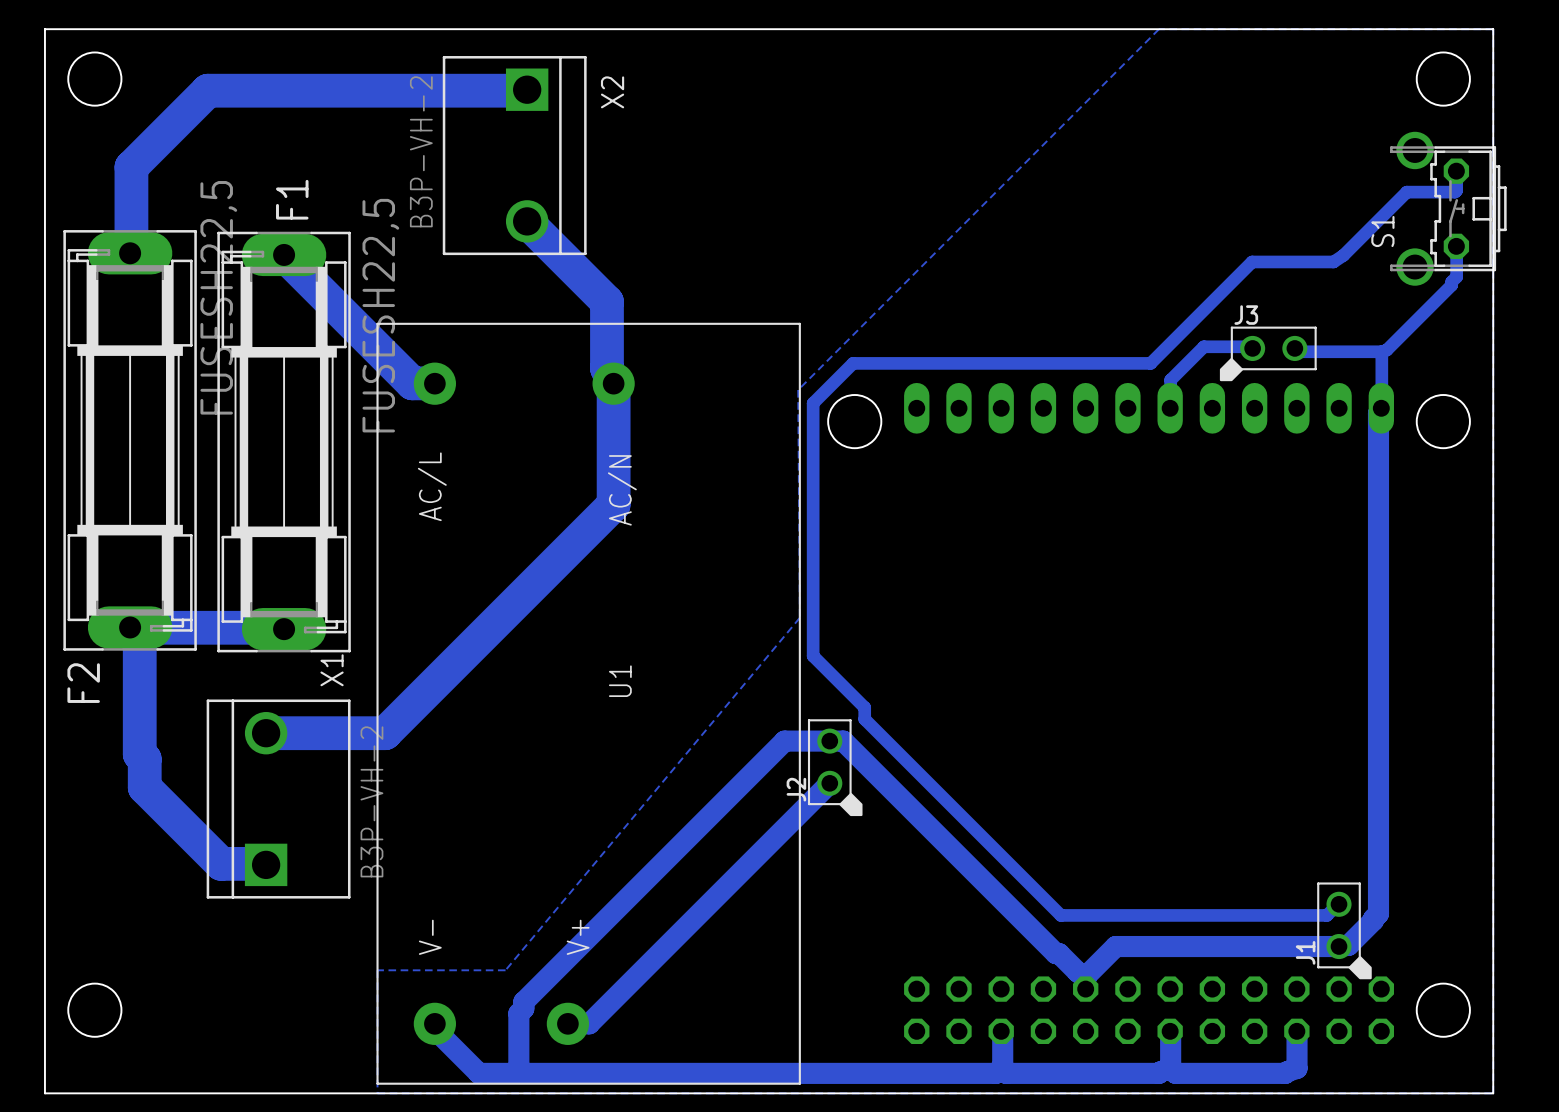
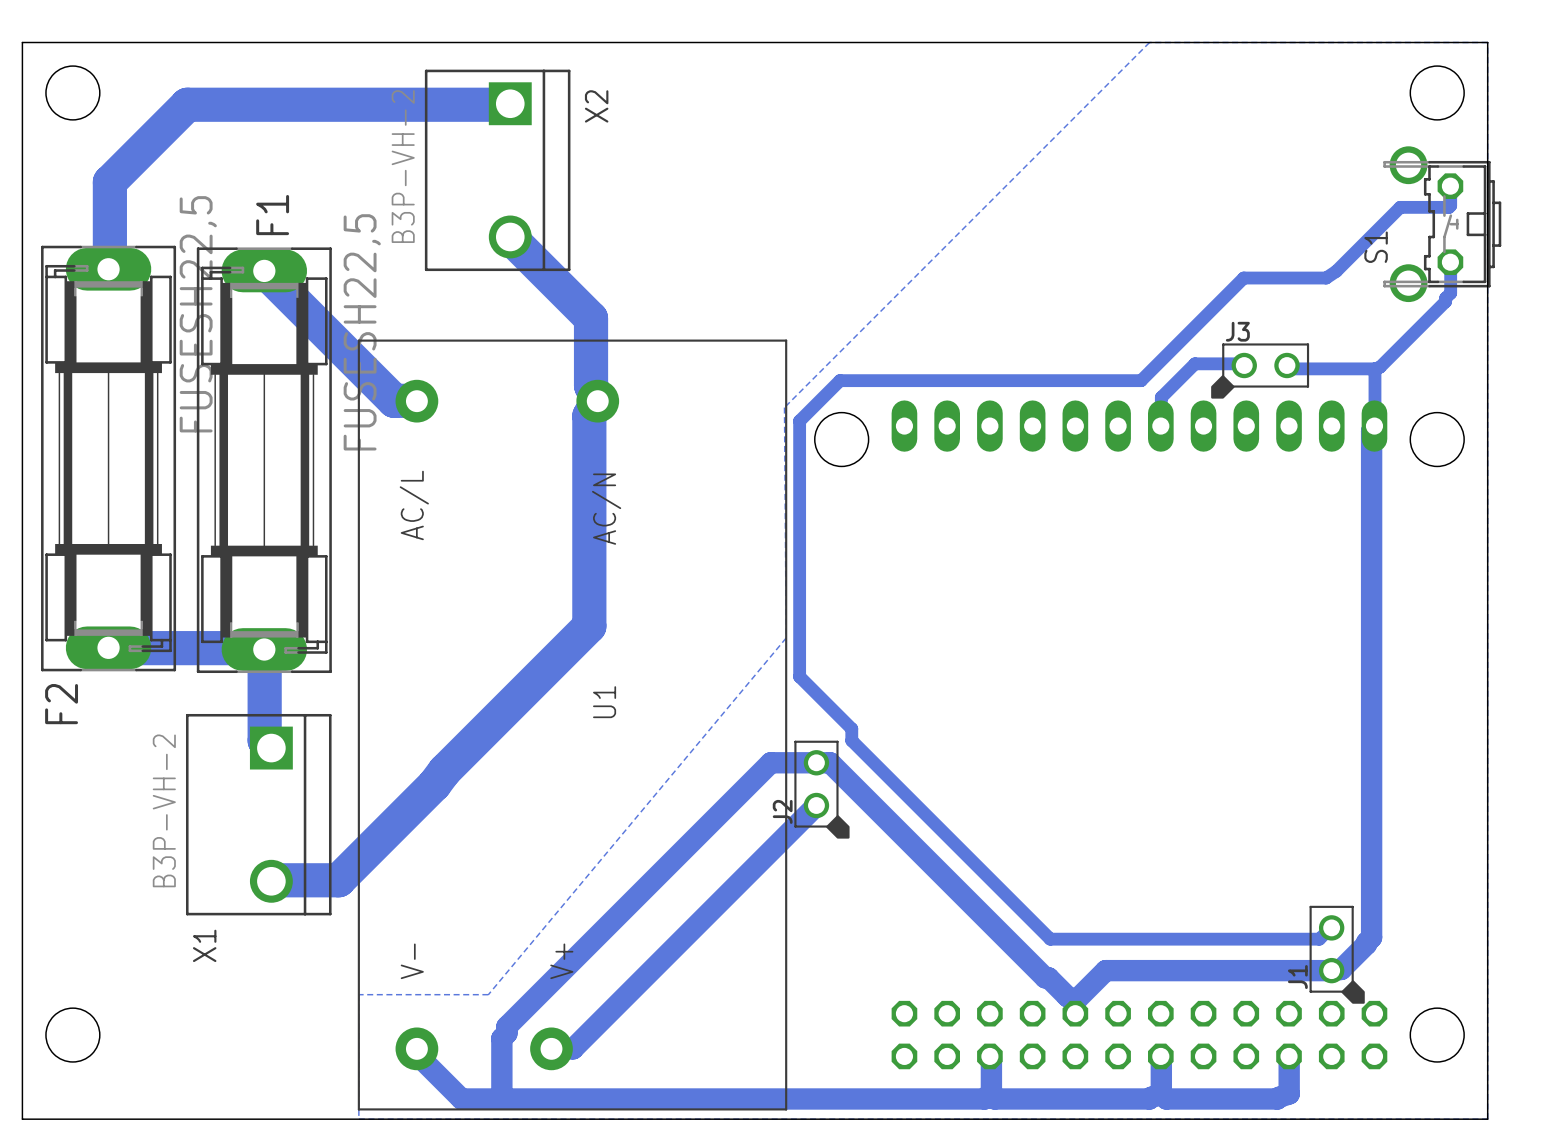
bottom track: (613, 383) (613, 504) (385, 733) (266, 733) -> (597, 401) (589, 415) (589, 626) (338, 880) (271, 881)
bottom track: (130, 627) (139, 644) (139, 754) (144, 759) (144, 787) (221, 863) (266, 864) -> none
bottom track: none -> (264, 649) (264, 740) (271, 748)
X1 rotation: 0° (278, 799) -> 180° (258, 814)

